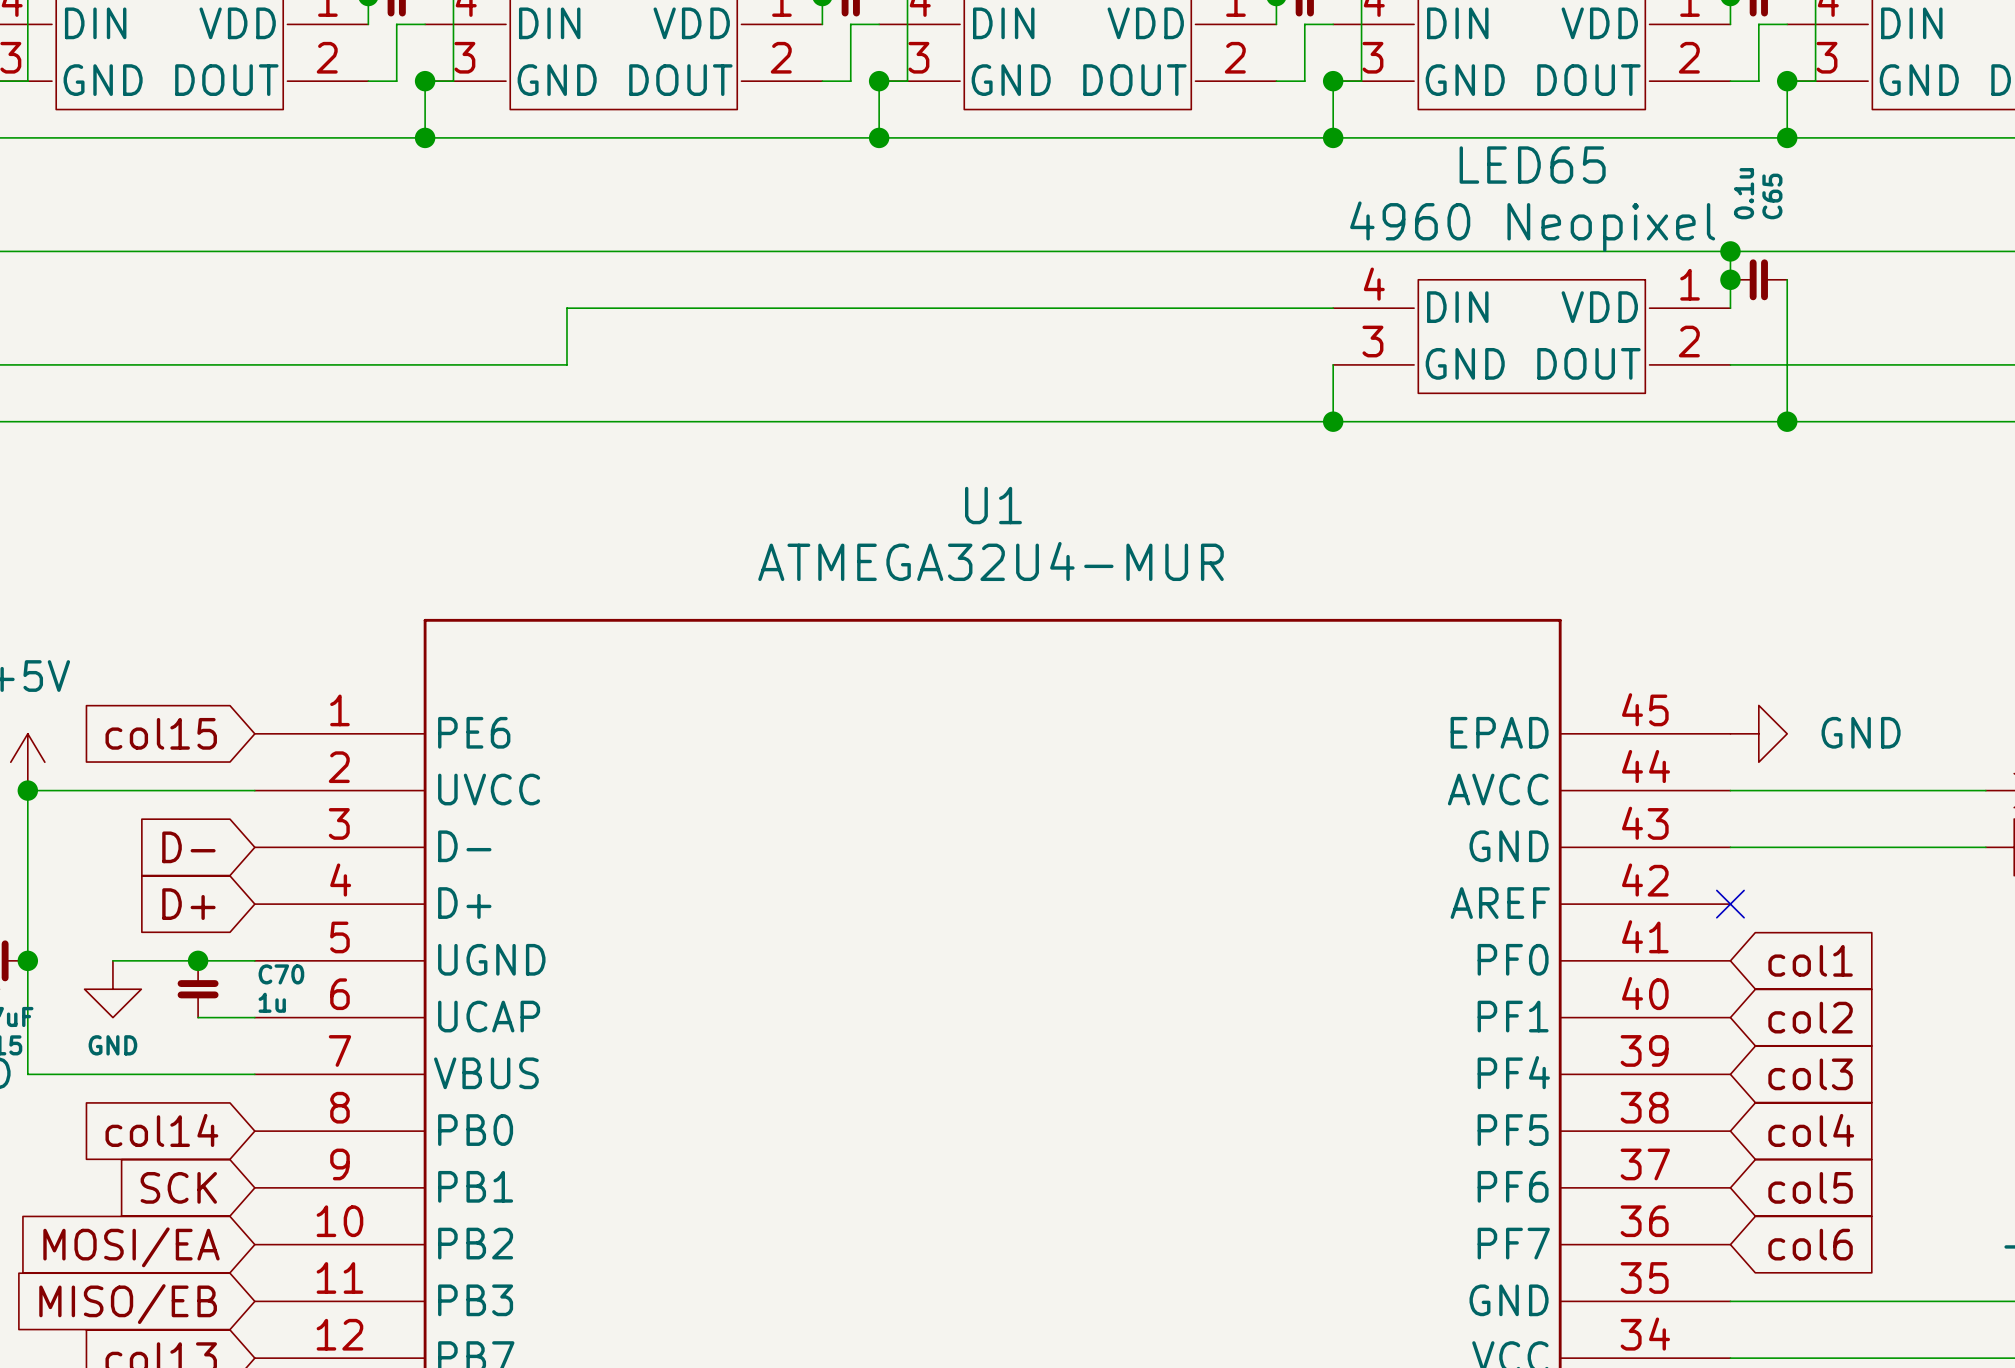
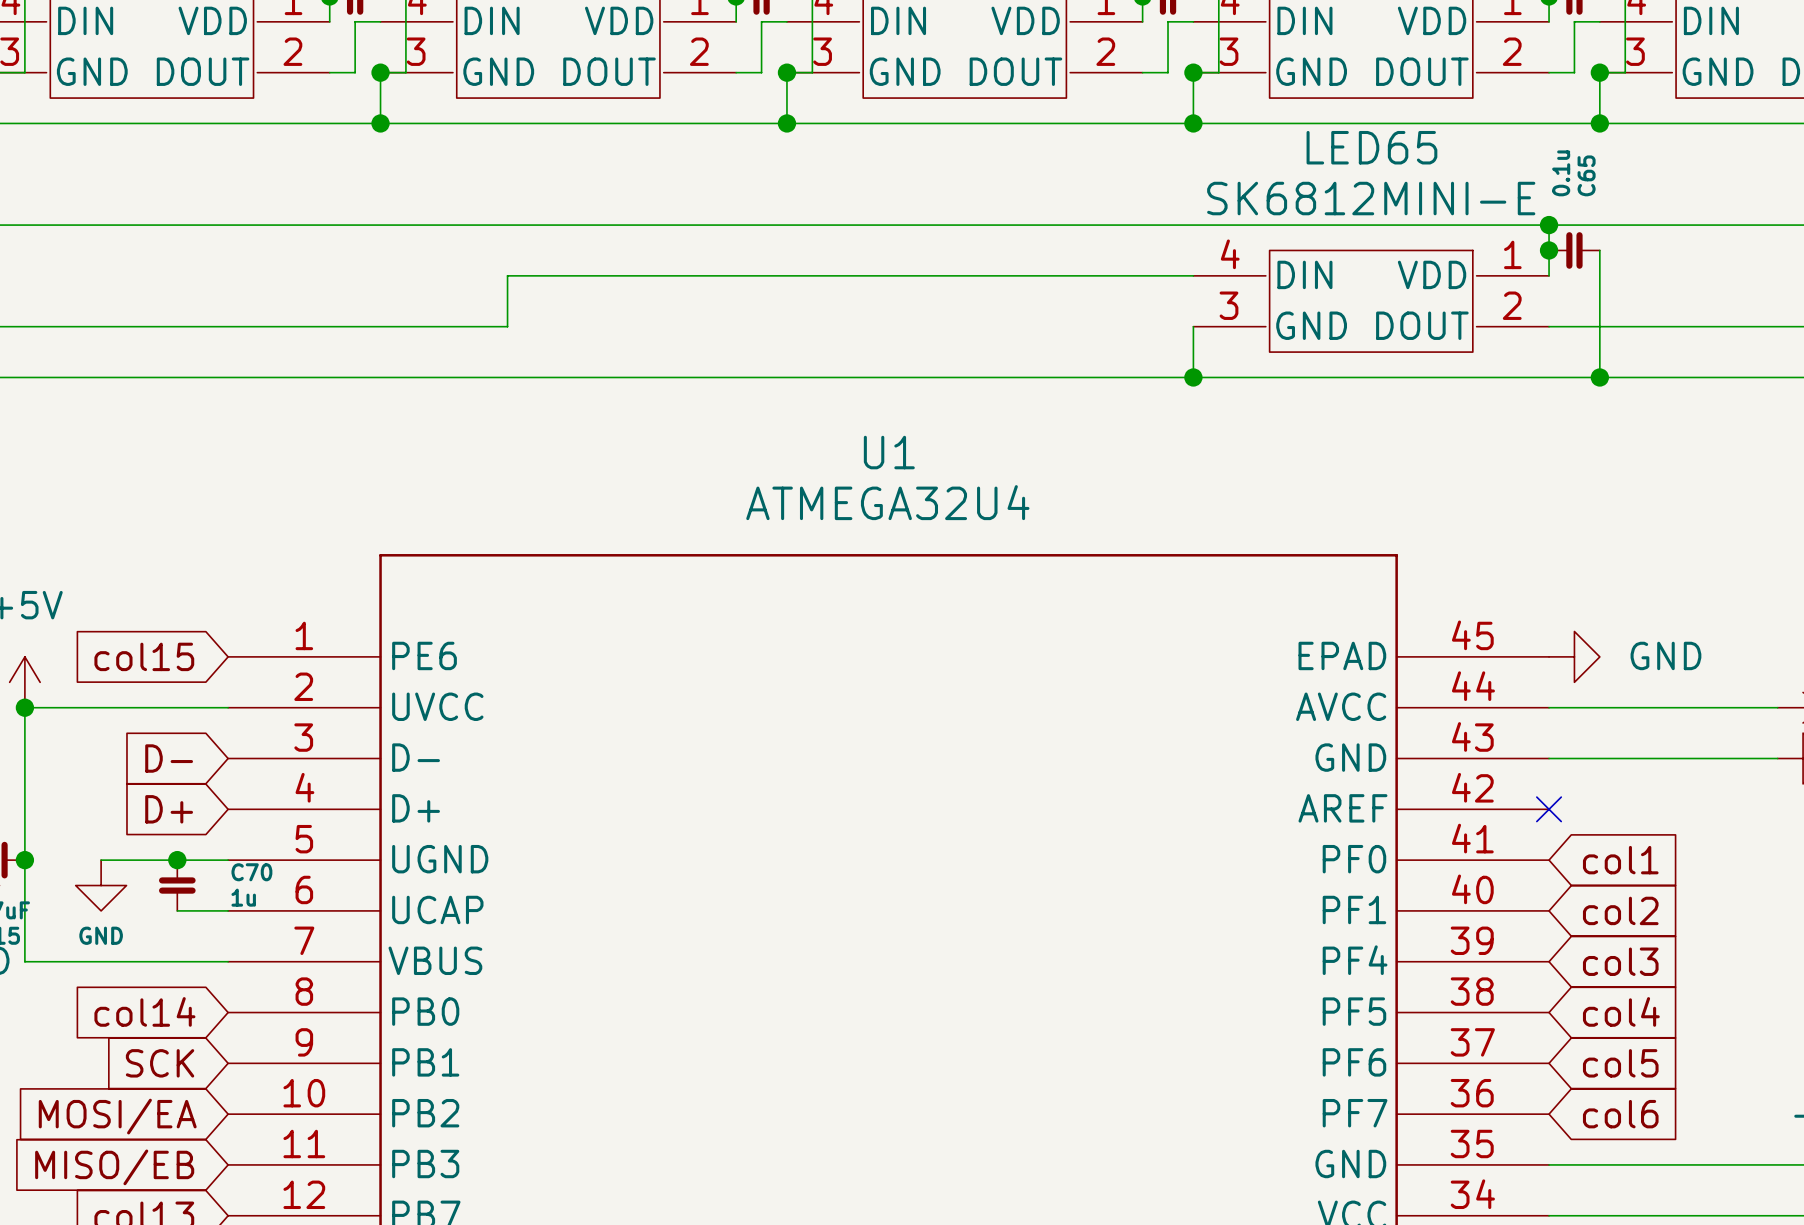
LED65 value: 4960 Neopixel (1532, 226) -> SK6812MINI-E (1371, 198)
U1 value: ATMEGA32U4-MUR (991, 561) -> ATMEGA32U4 (887, 502)

